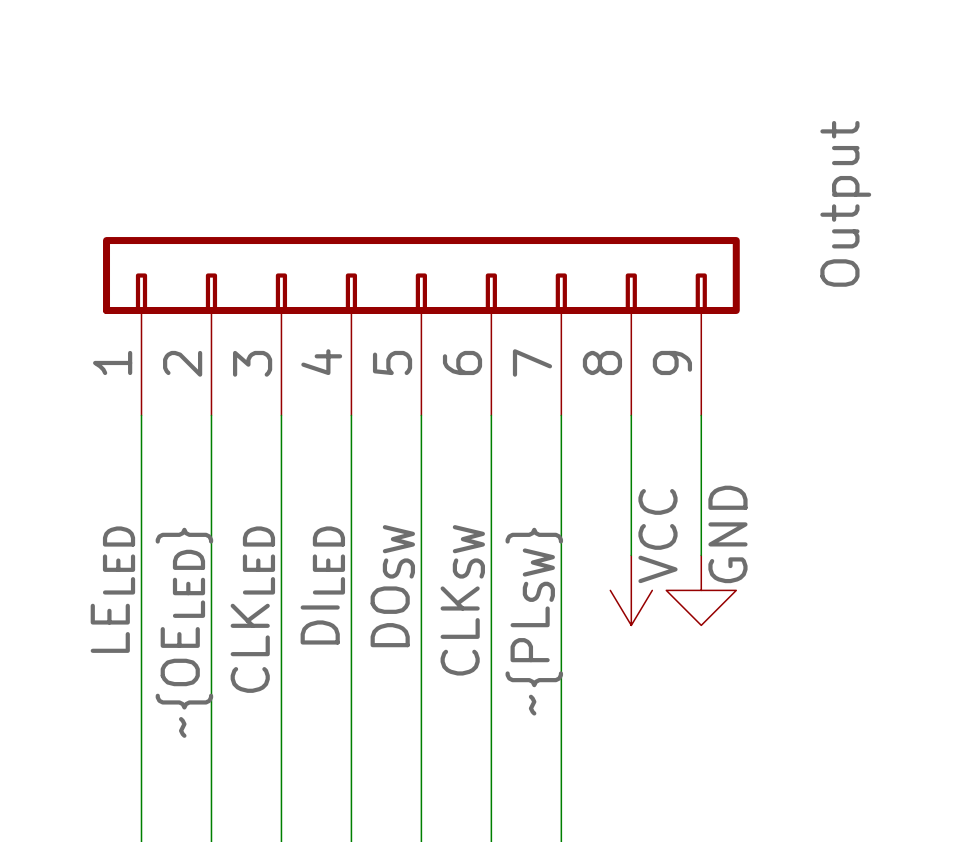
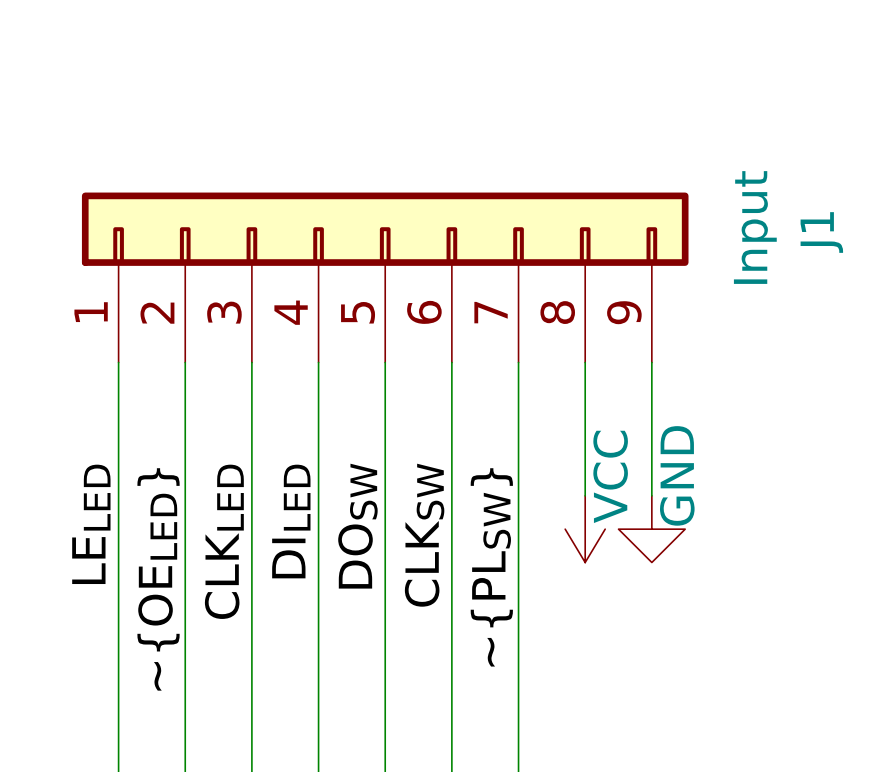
J1 value: Output (845, 203) -> Input (755, 227)
J1 name: none -> J1 (821, 232)

